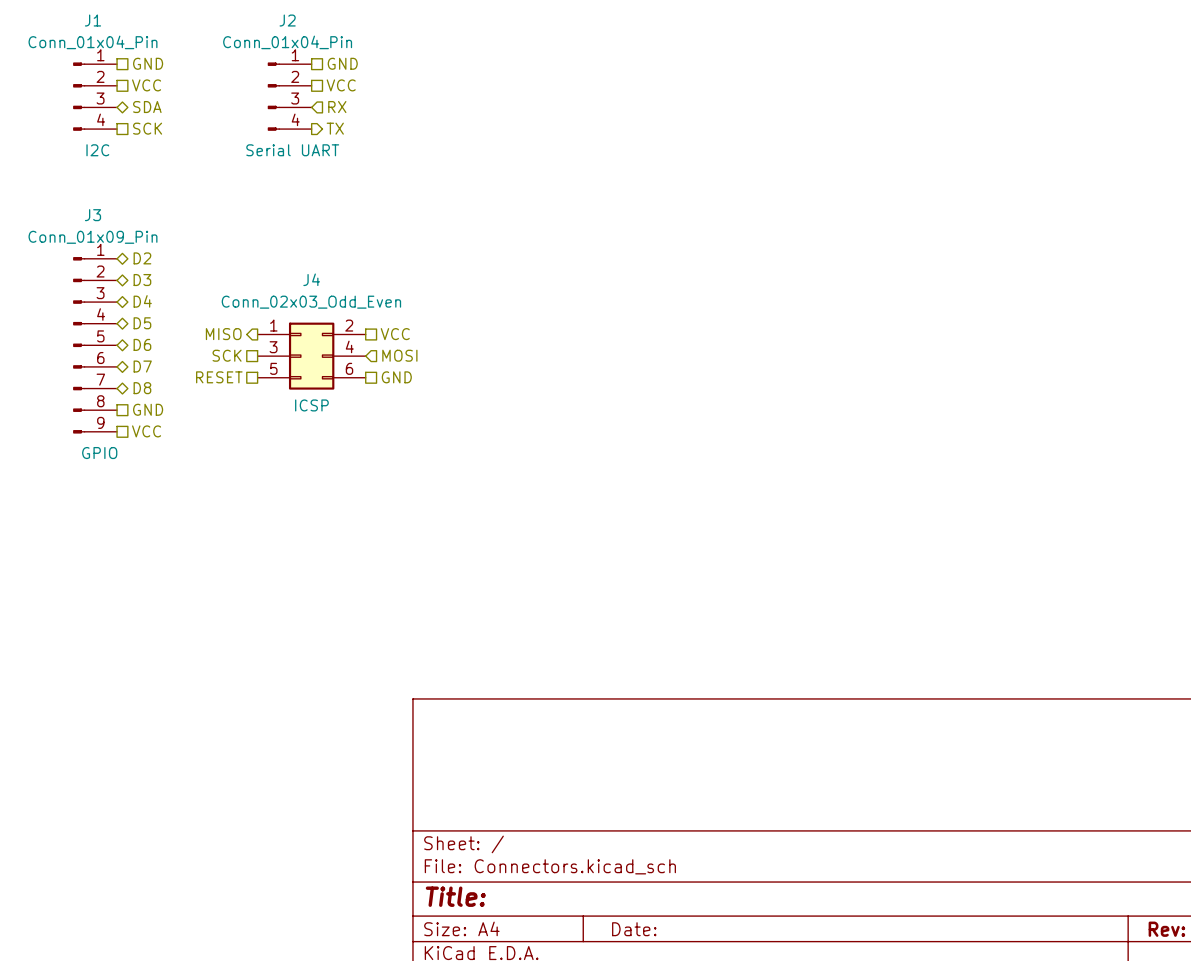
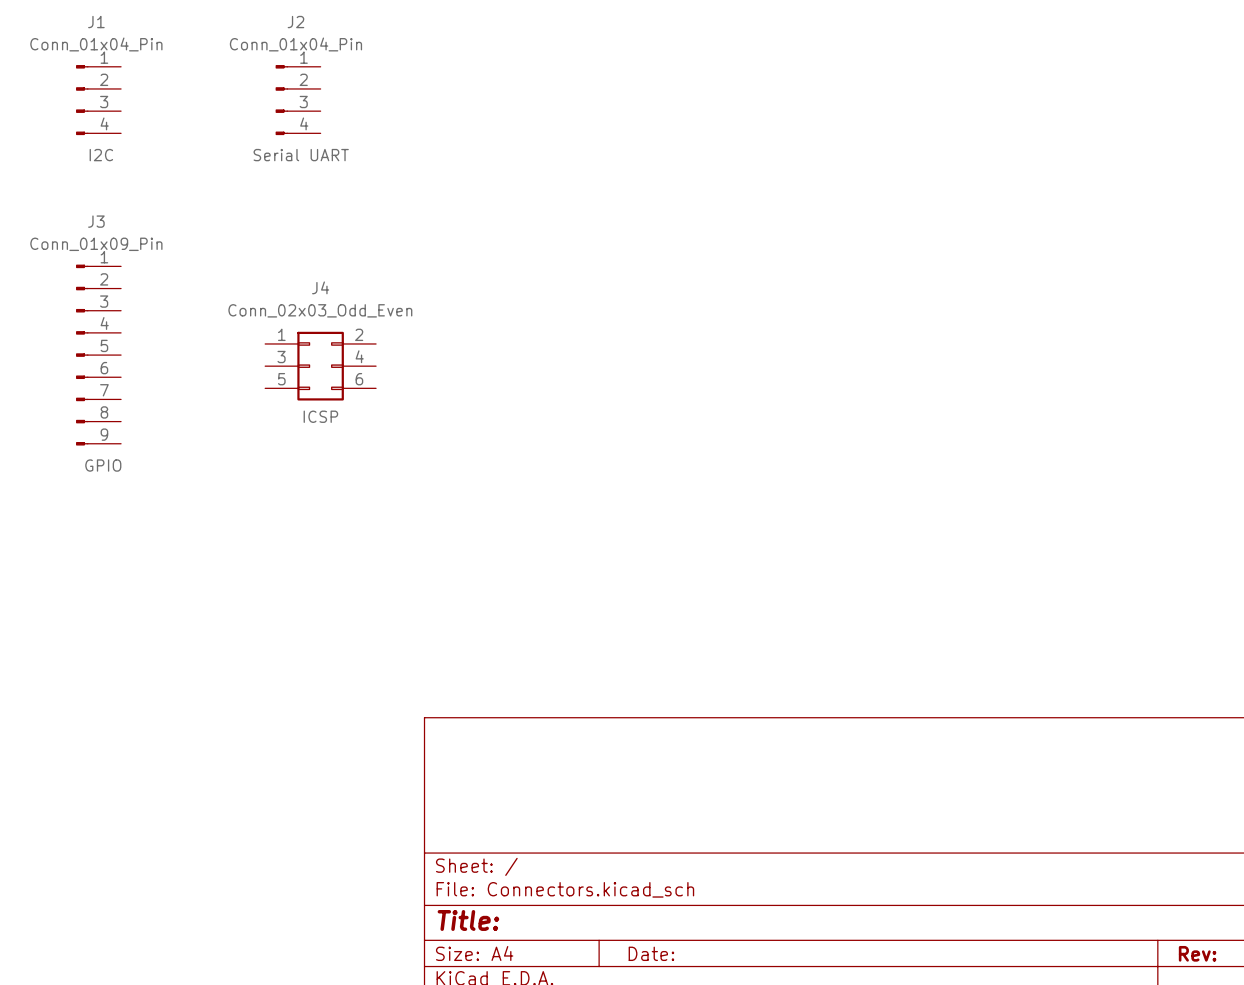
hierarchical label: GND (148, 63) -> none
hierarchical label: GND (342, 63) -> none
hierarchical label: VCC (146, 85) -> none
hierarchical label: VCC (341, 85) -> none
hierarchical label: SDA (147, 107) -> none
hierarchical label: RX (337, 107) -> none
hierarchical label: SCK (147, 128) -> none
hierarchical label: TX (335, 128) -> none
hierarchical label: D2 (142, 258) -> none
hierarchical label: D3 (142, 280) -> none
hierarchical label: D4 (142, 301) -> none
hierarchical label: D5 (142, 323) -> none
hierarchical label: MISO (223, 334) -> none
hierarchical label: VCC (395, 334) -> none
hierarchical label: D6 (142, 344) -> none
hierarchical label: SCK (227, 355) -> none
hierarchical label: MOSI (399, 355) -> none
hierarchical label: D7 (142, 366) -> none
hierarchical label: RESET (219, 377) -> none
hierarchical label: GND (396, 377) -> none
hierarchical label: D8 (142, 388) -> none
hierarchical label: GND (148, 409) -> none
hierarchical label: VCC (146, 431) -> none

